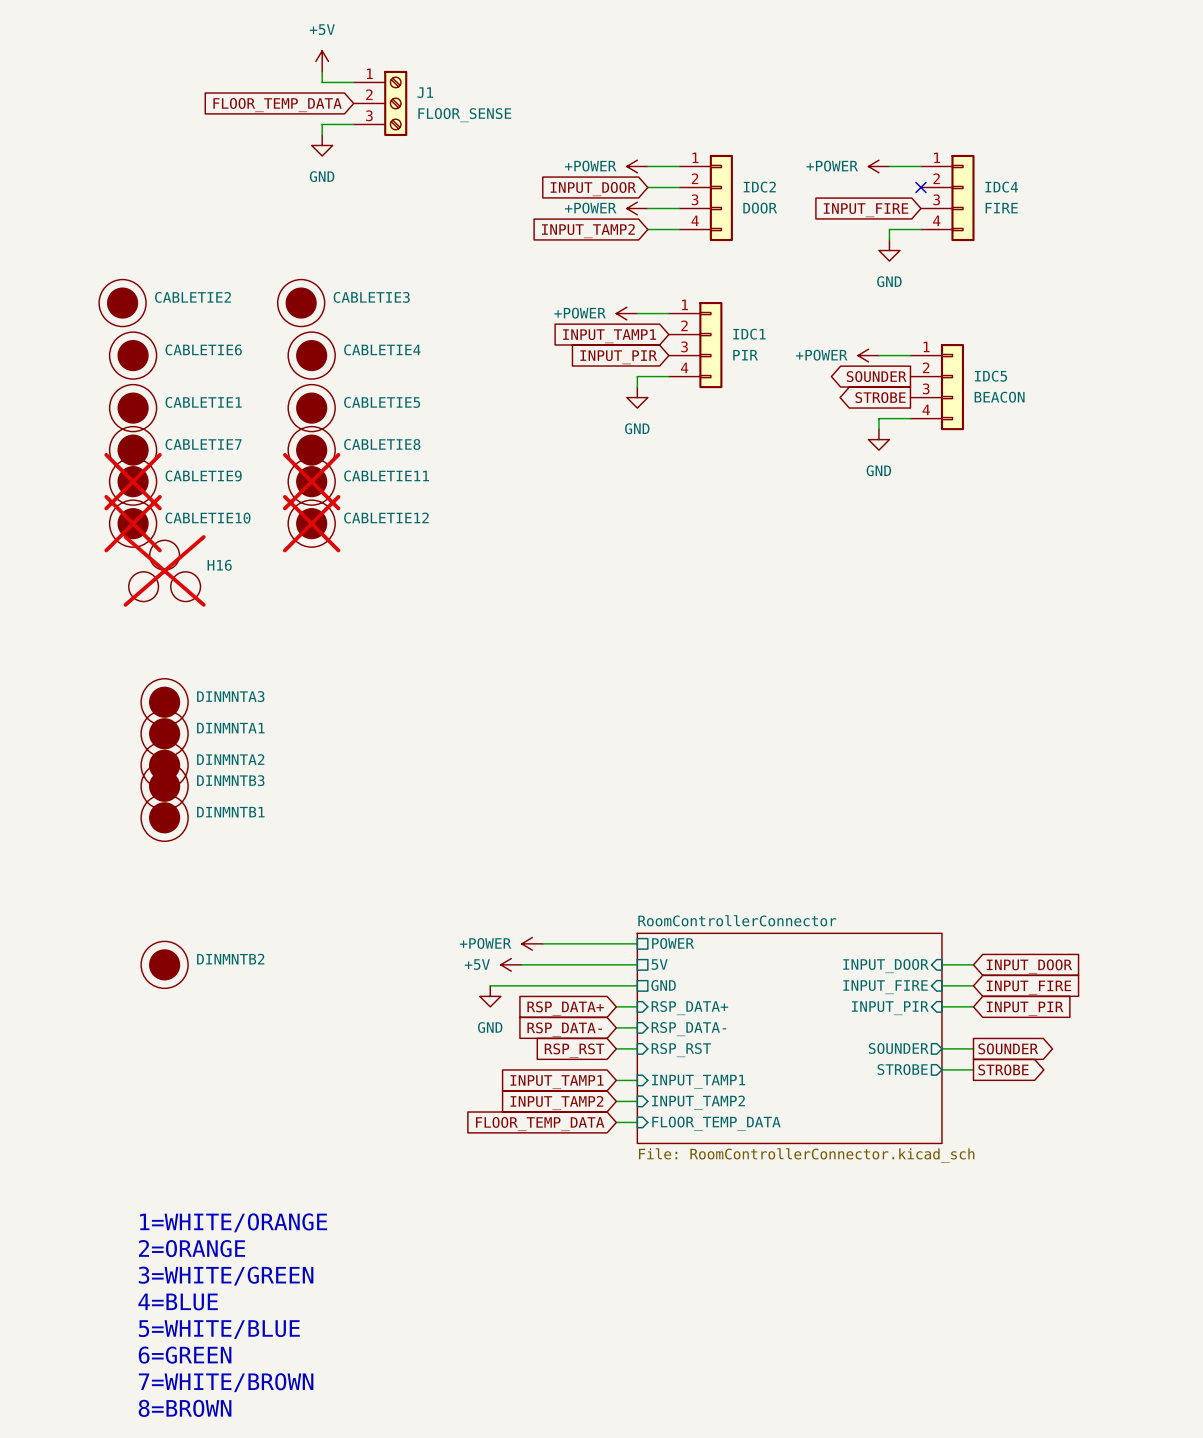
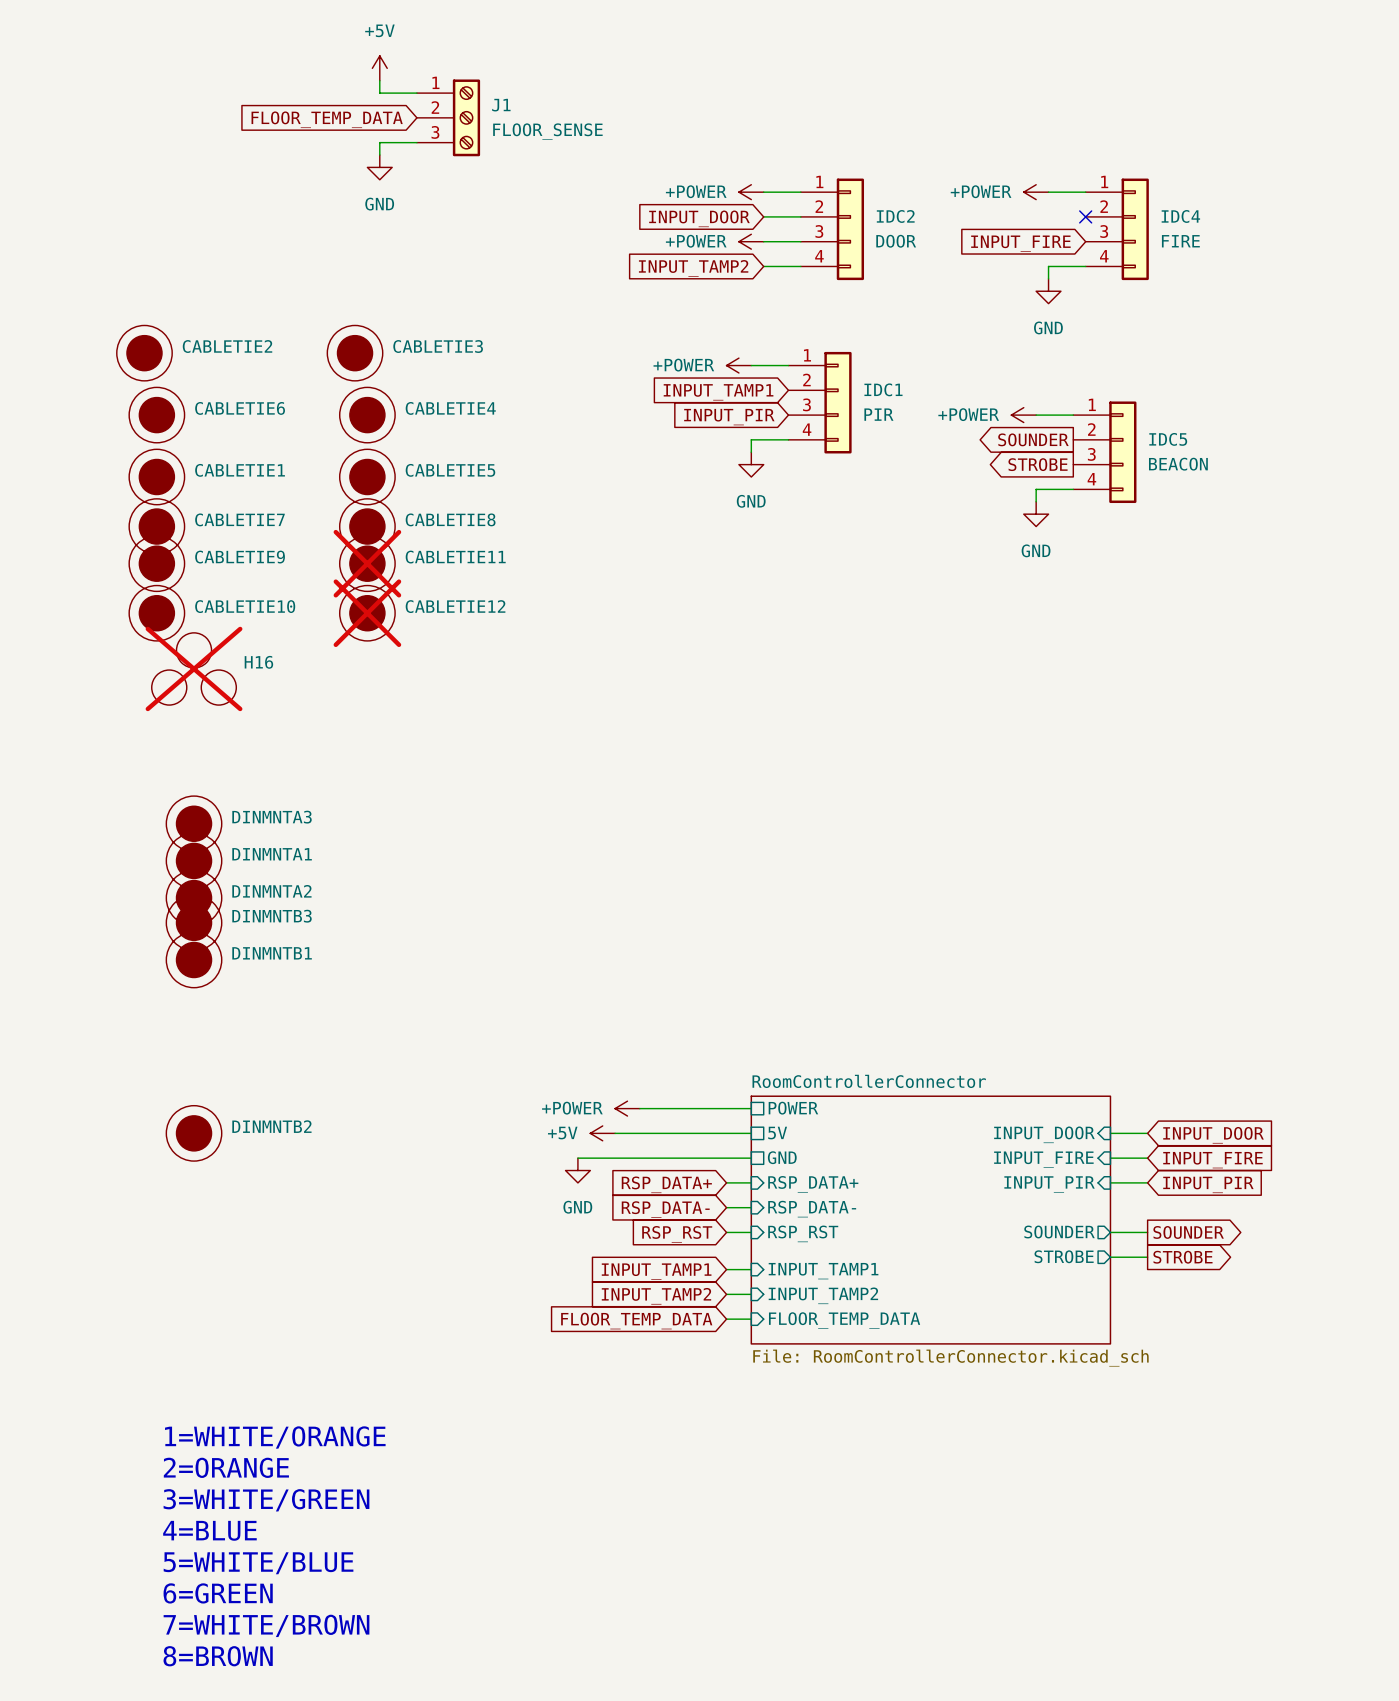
CABLETIE9 do-not-place cross: (133, 481) -> none
CABLETIE10 do-not-place cross: (133, 523) -> none

